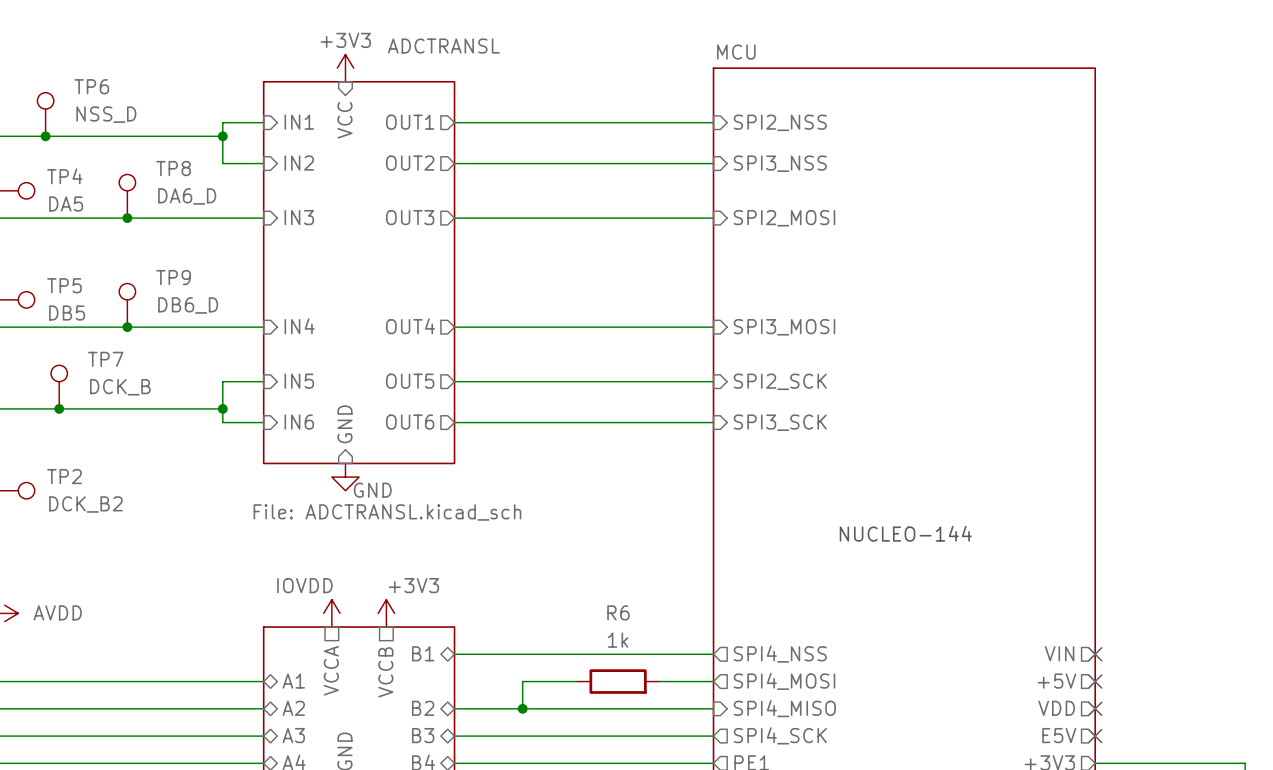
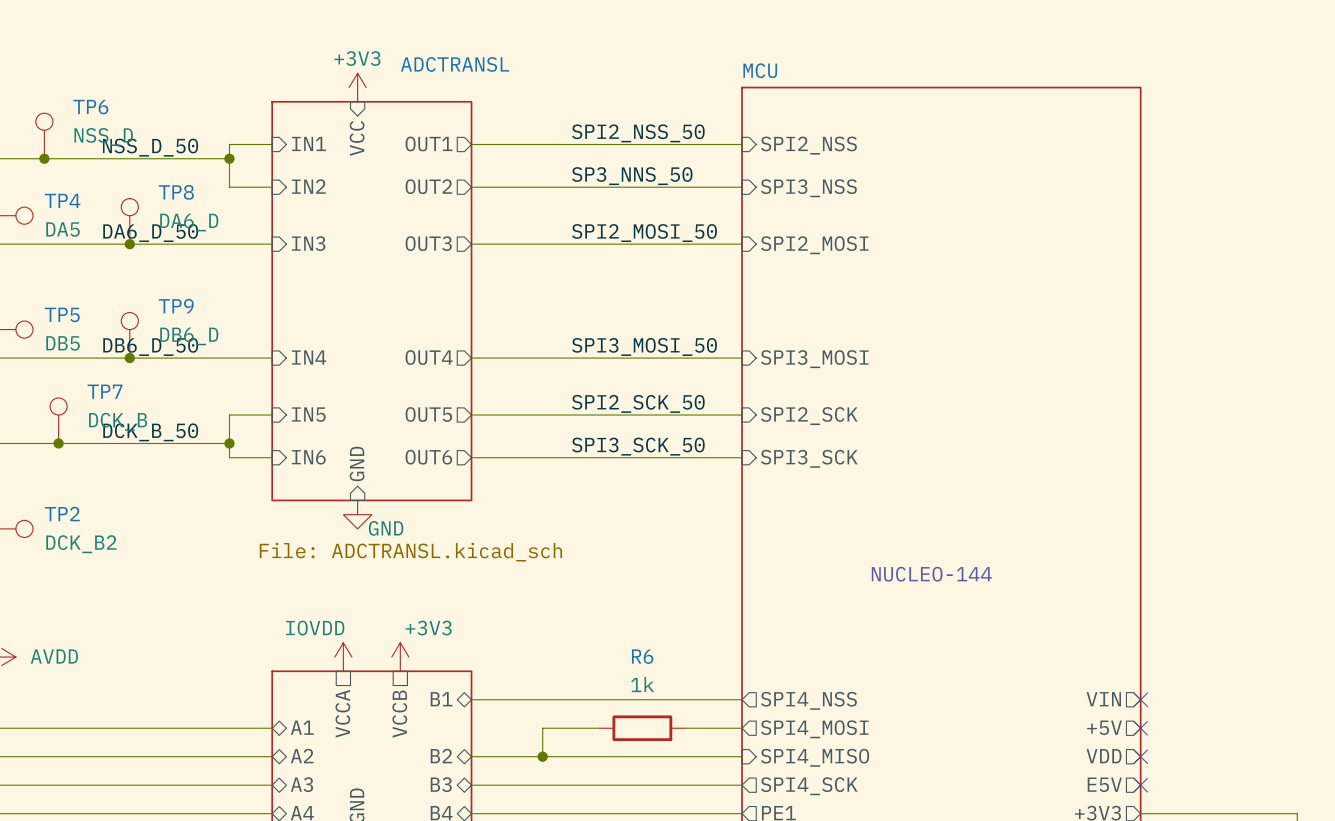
label: none -> SPI2_NSS_50 (638, 133)
label: none -> NSS_D_50 (150, 147)
label: none -> SP3_NNS_50 (632, 176)
label: none -> DA6_D_50 (150, 233)
label: none -> SPI2_MOSI_50 (644, 233)
label: none -> DB6_D_50 (150, 346)
label: none -> SPI3_MOSI_50 (644, 346)
label: none -> SPI2_SCK_50 (638, 403)
label: none -> DCK_B_50 (150, 432)
label: none -> SPI3_SCK_50 (638, 446)

